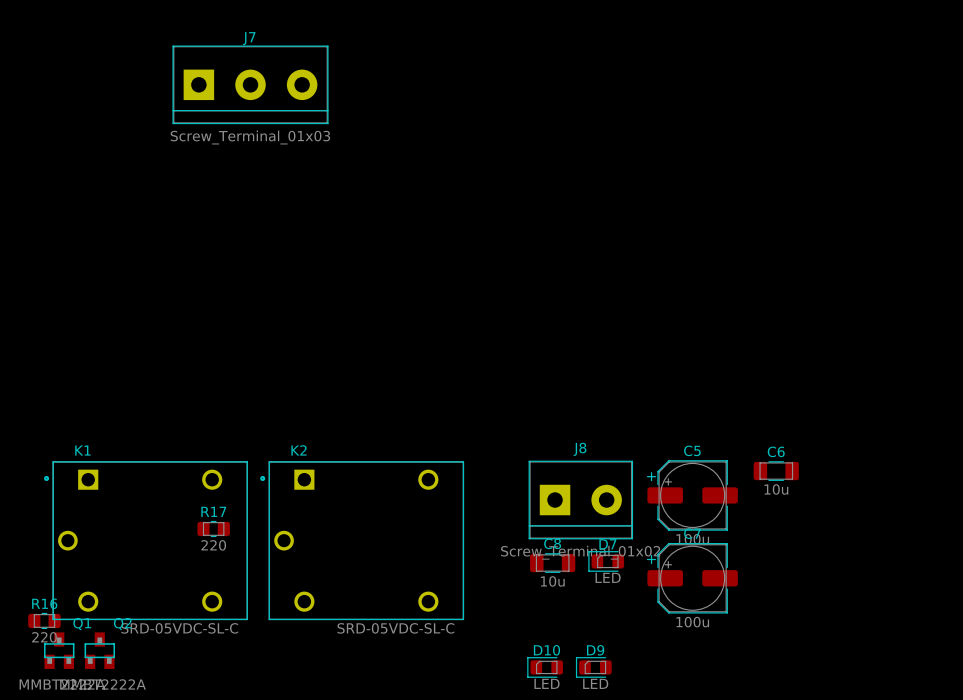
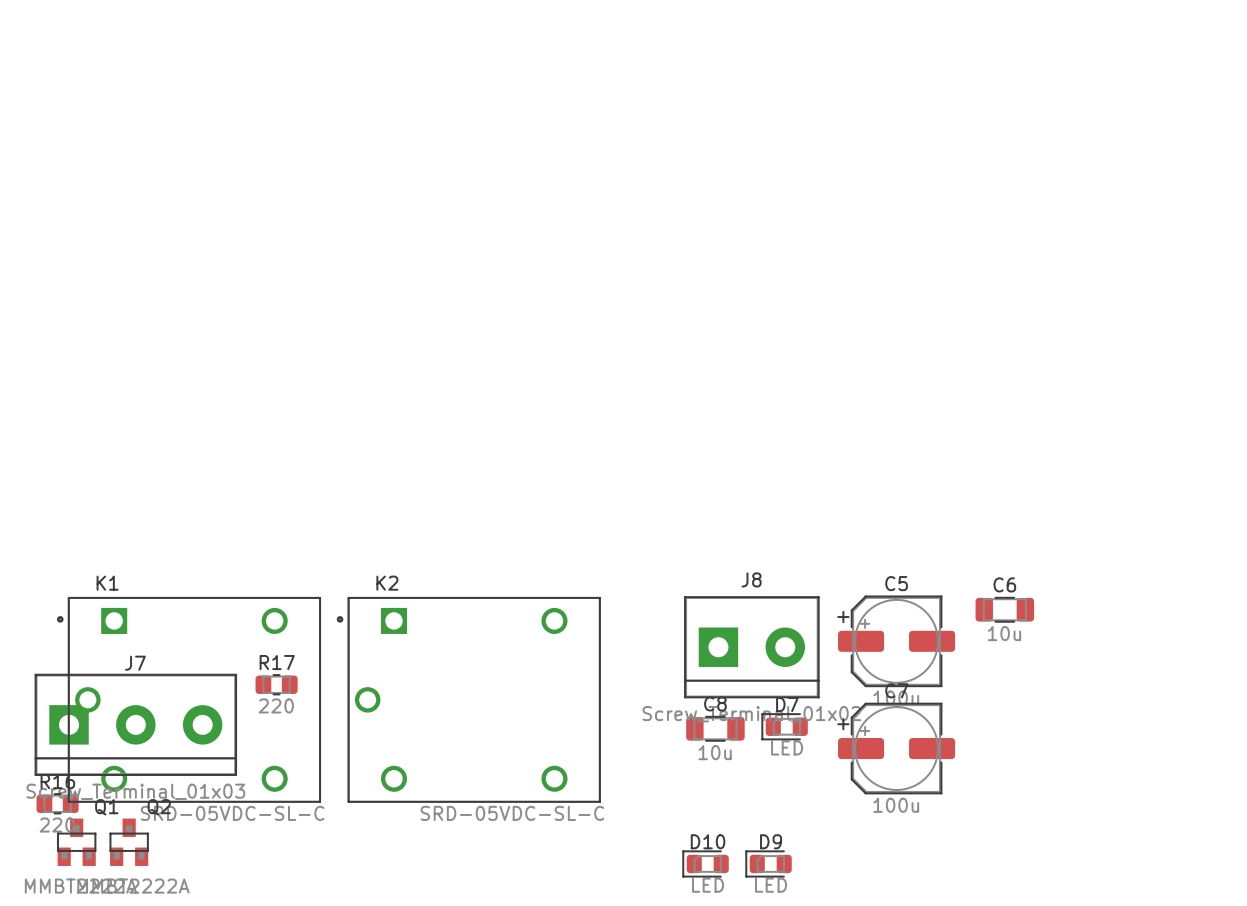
J7 position: (250, 84) -> (135, 724)

